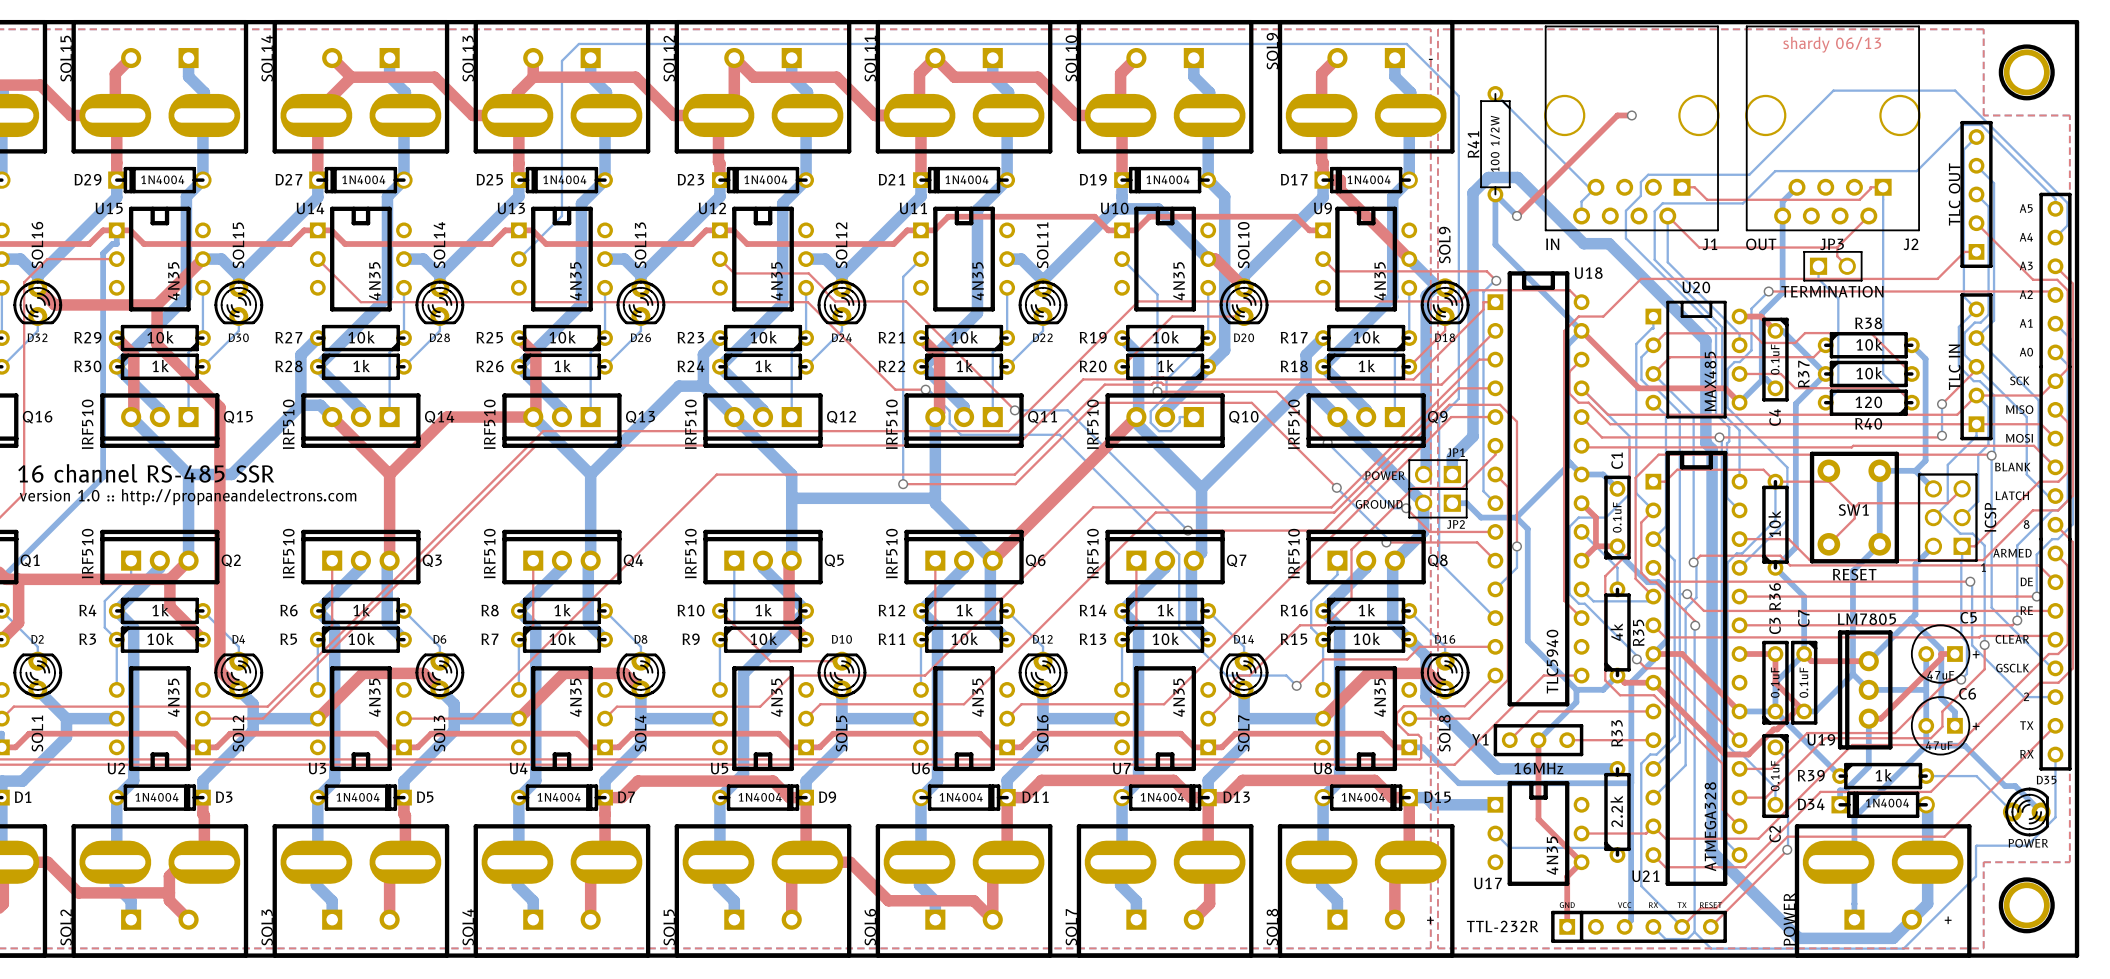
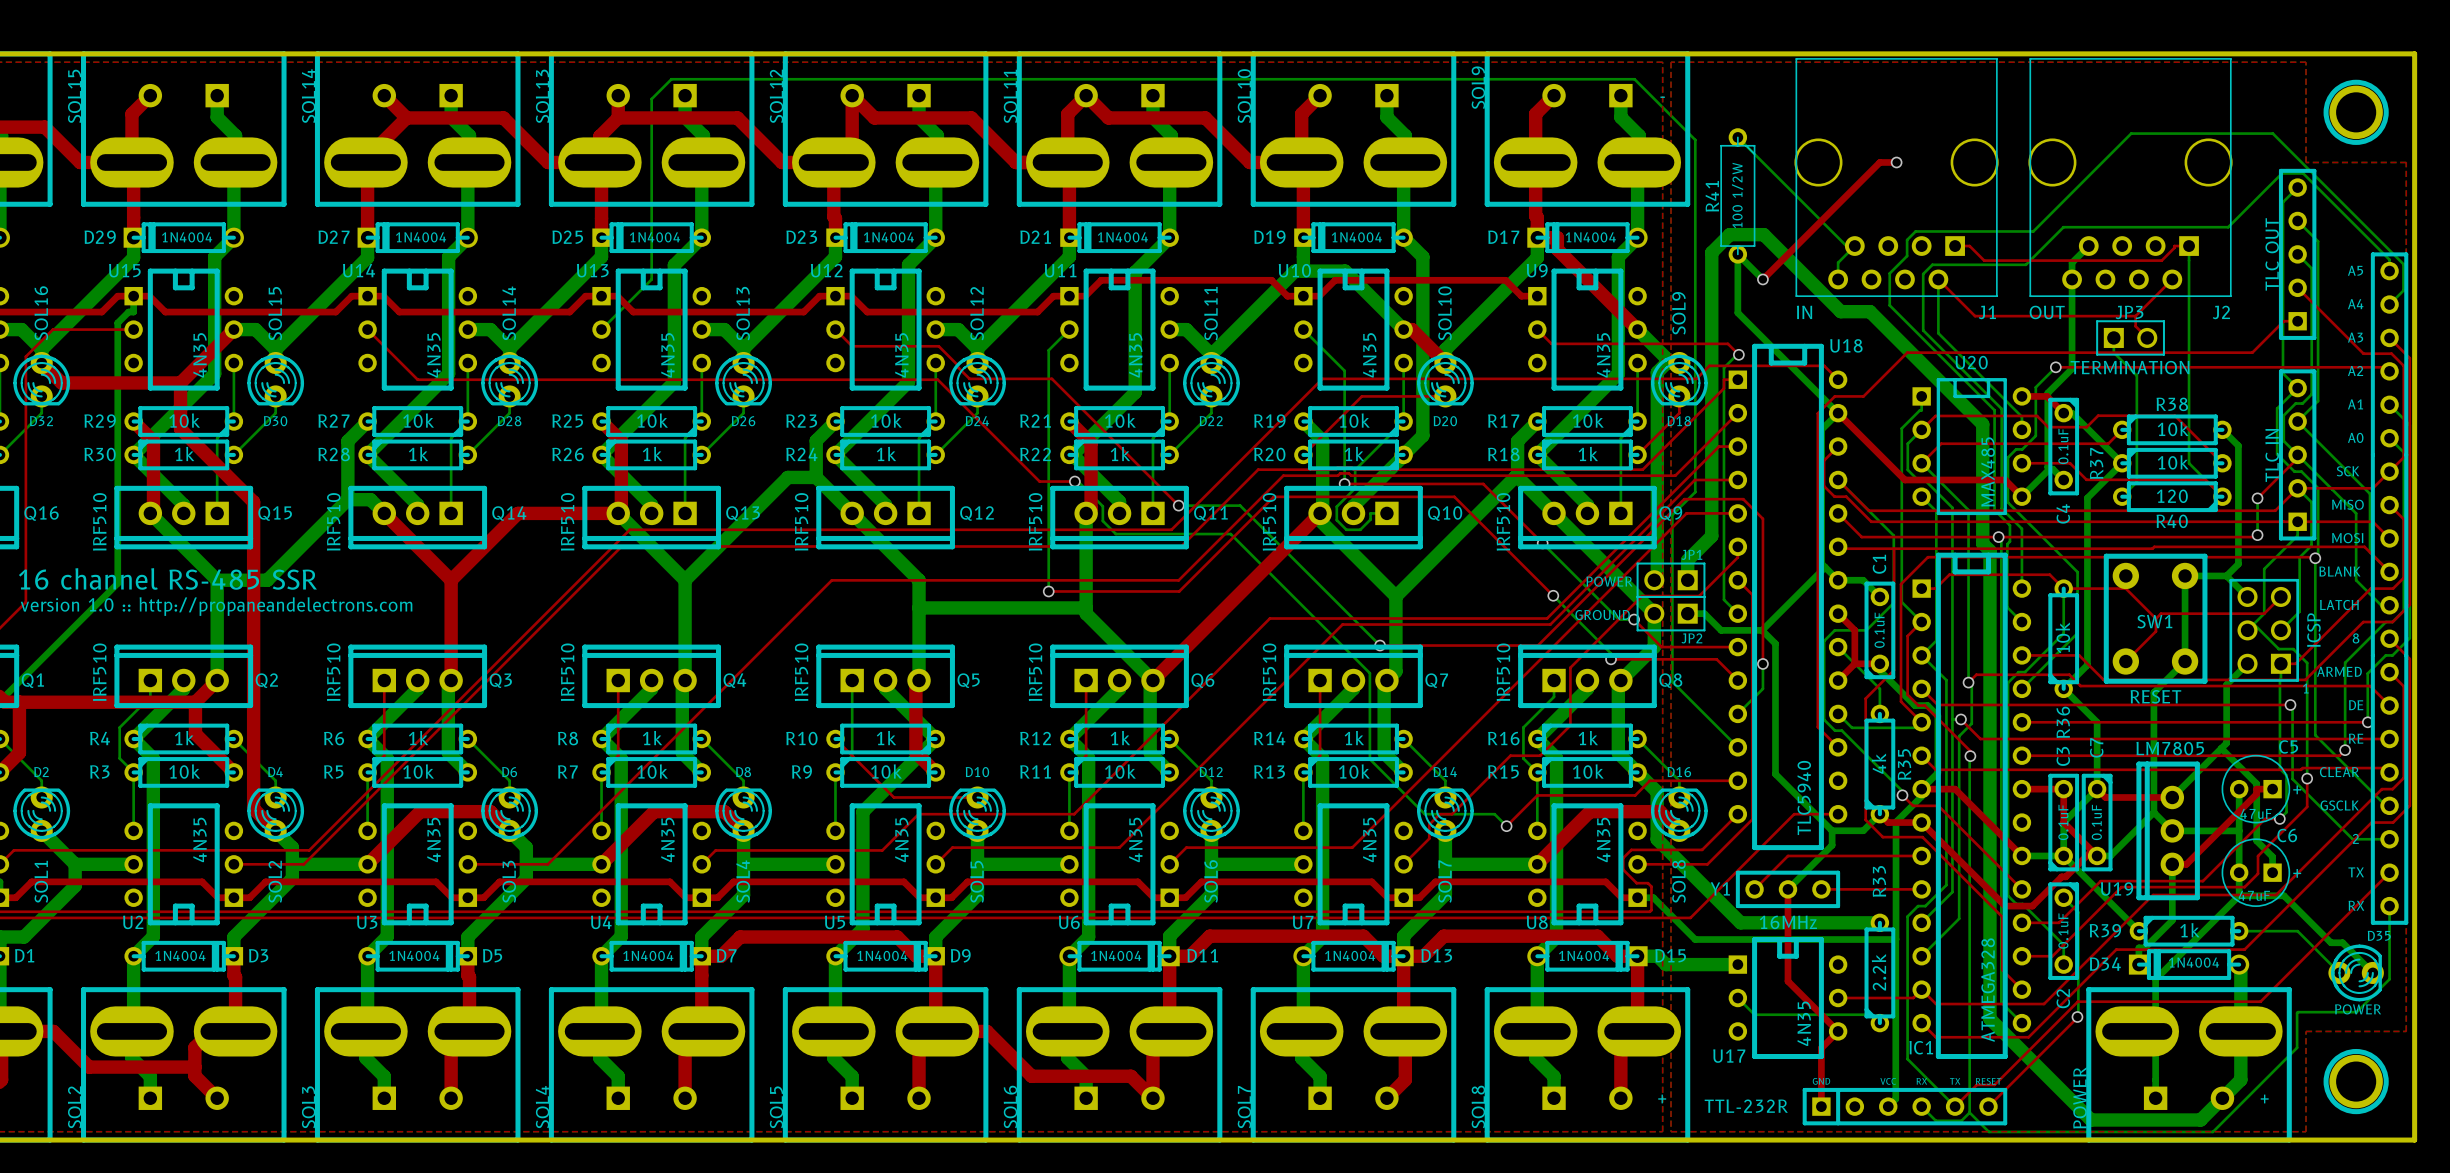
text: shardy 06/13 (1832, 44) -> none
U21 name: U21 (1645, 876) -> IC1 (1921, 1047)

